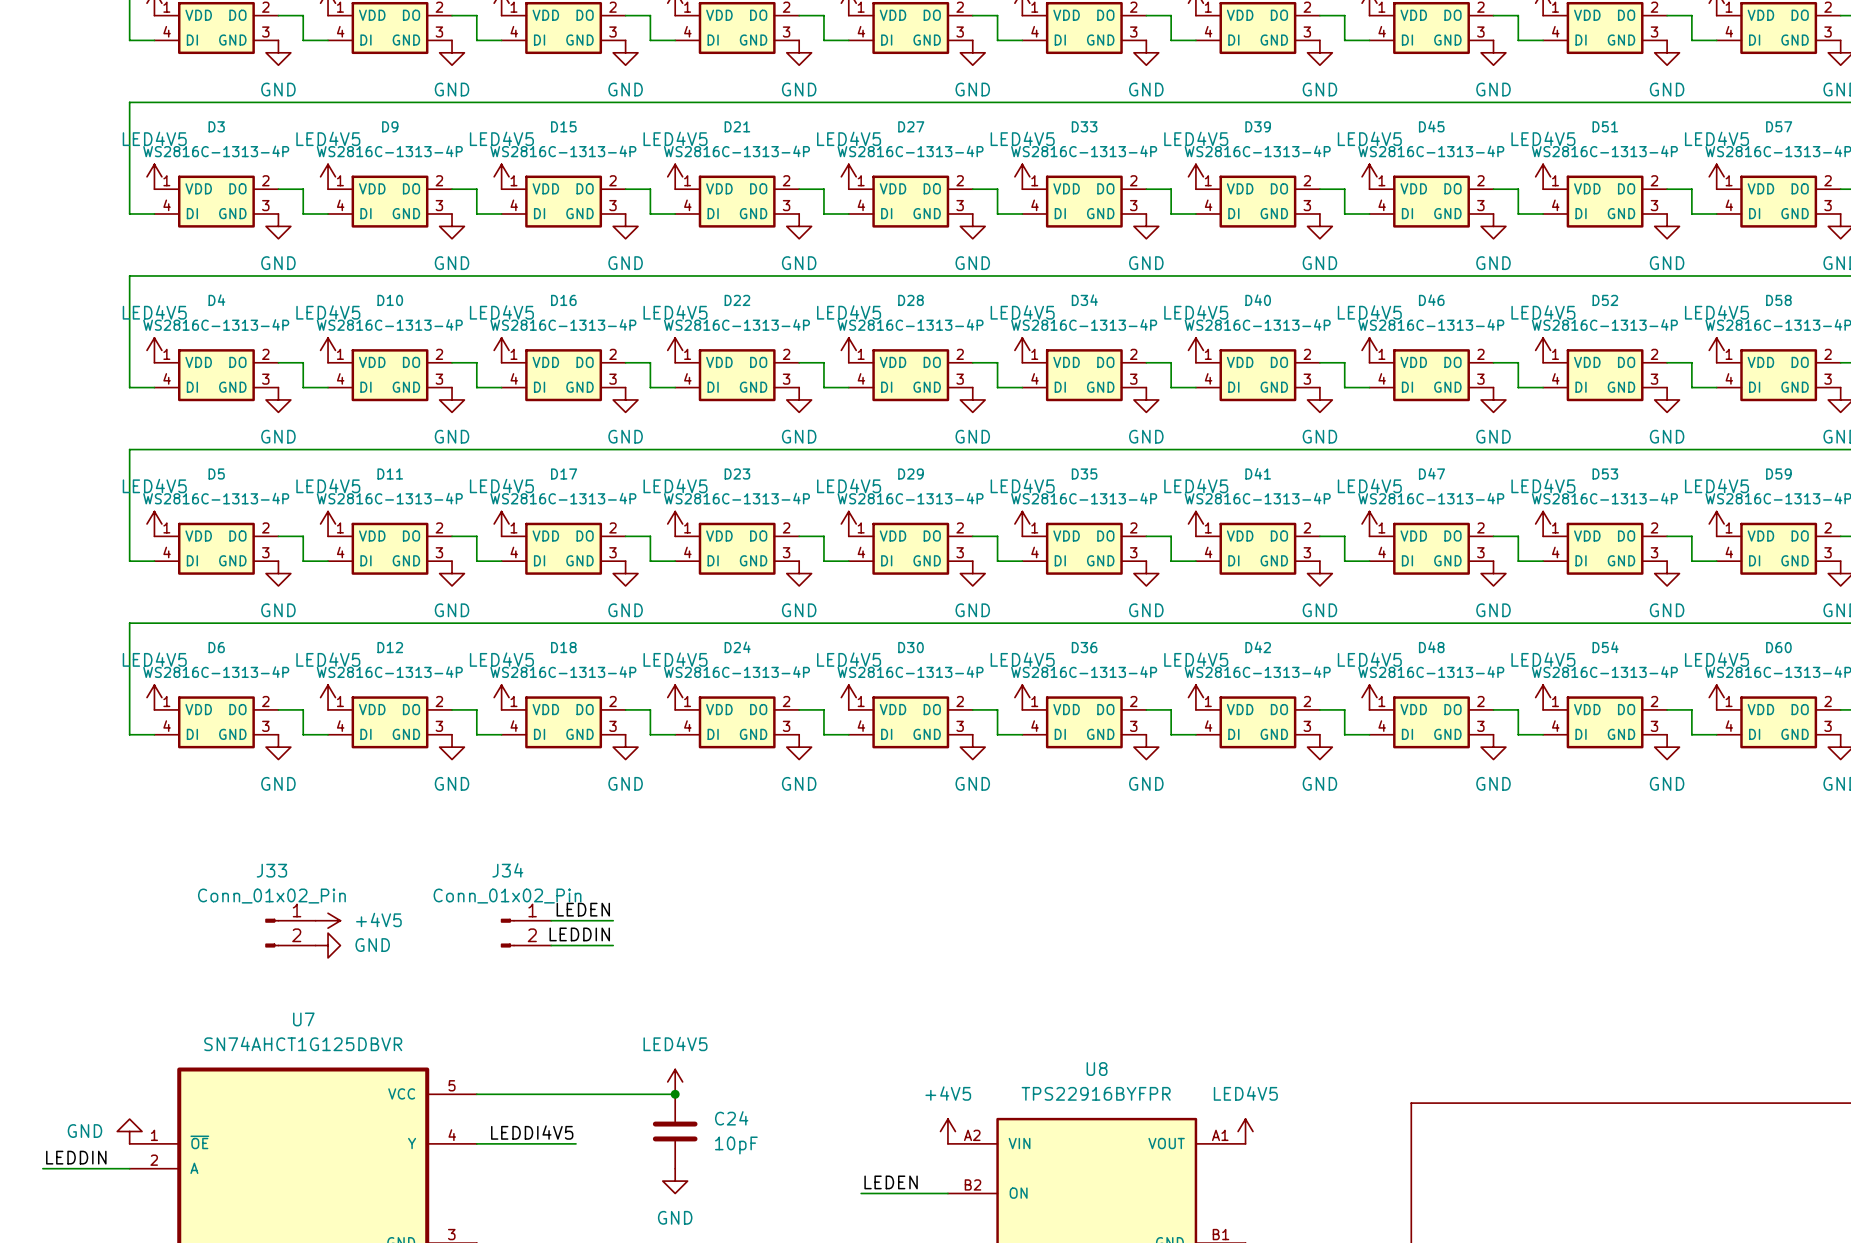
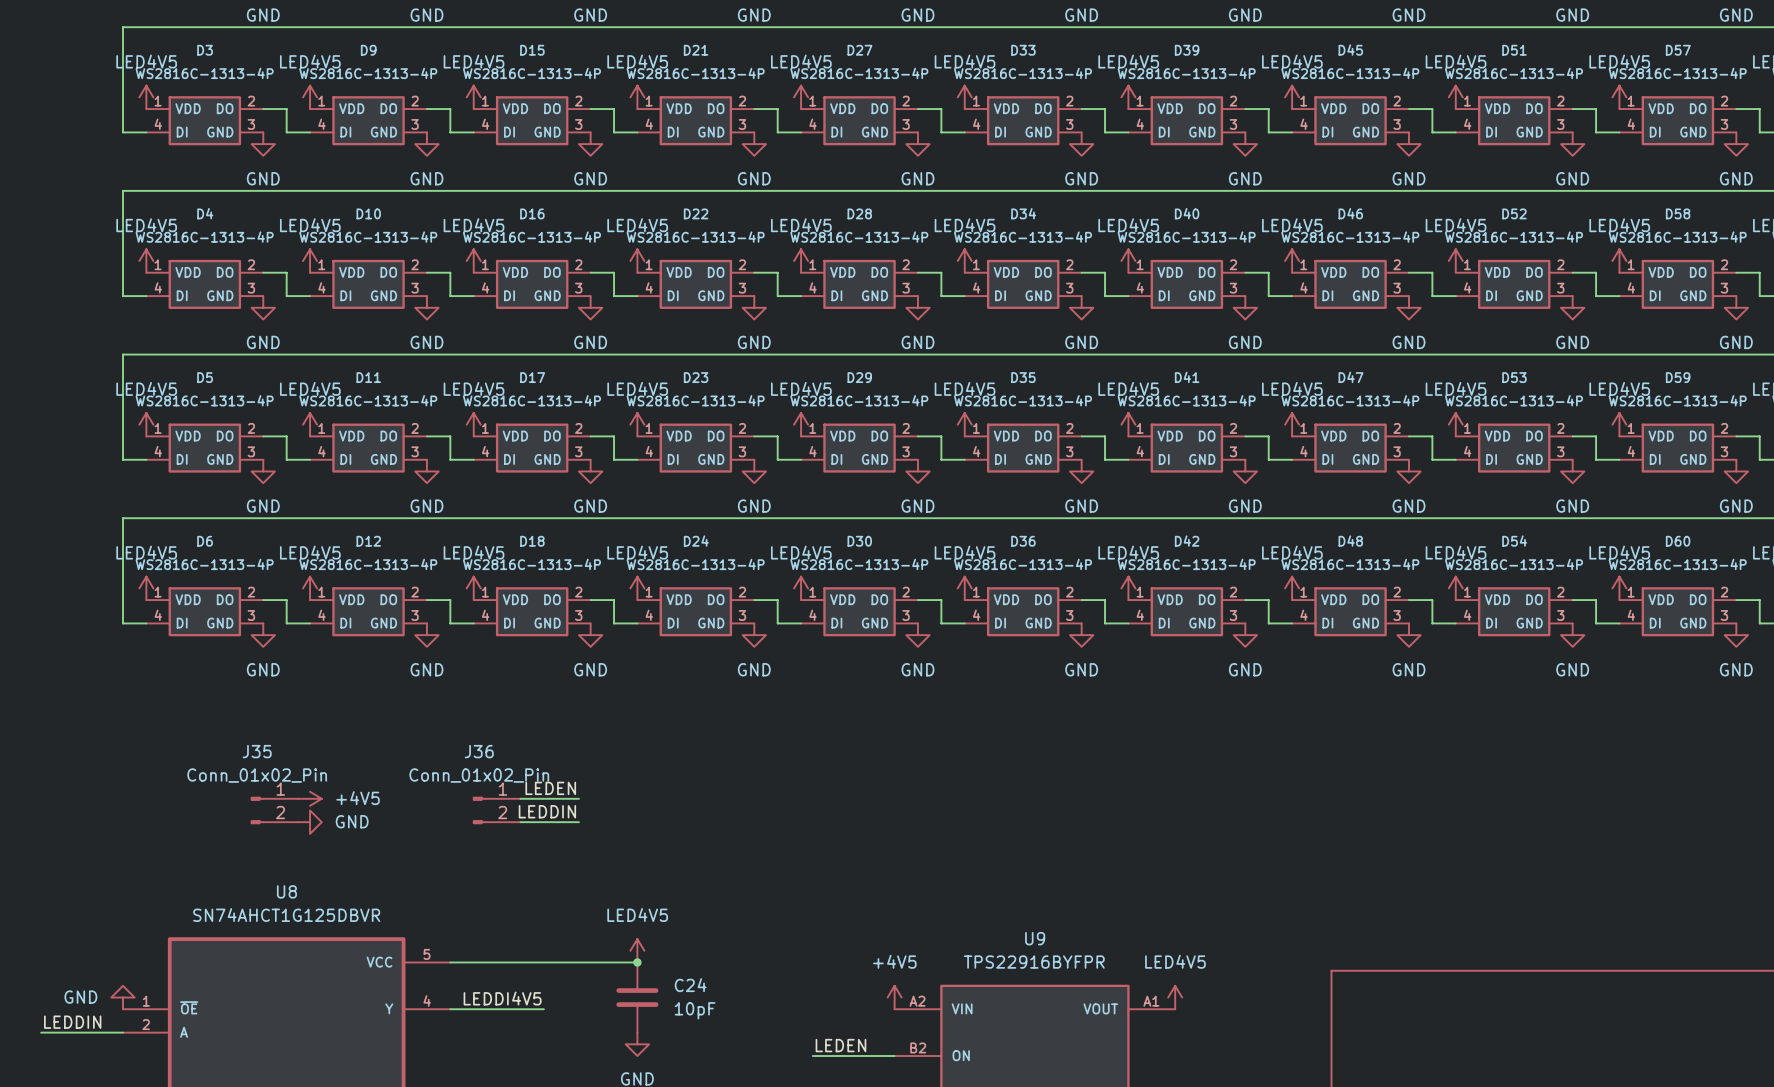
J33 name: J33 (271, 870) -> J35 (257, 751)
J34 name: J34 (507, 870) -> J36 (479, 751)
U7 name: U7 (303, 1019) -> U8 (286, 891)
U8 name: U8 (1097, 1069) -> U9 (1035, 938)

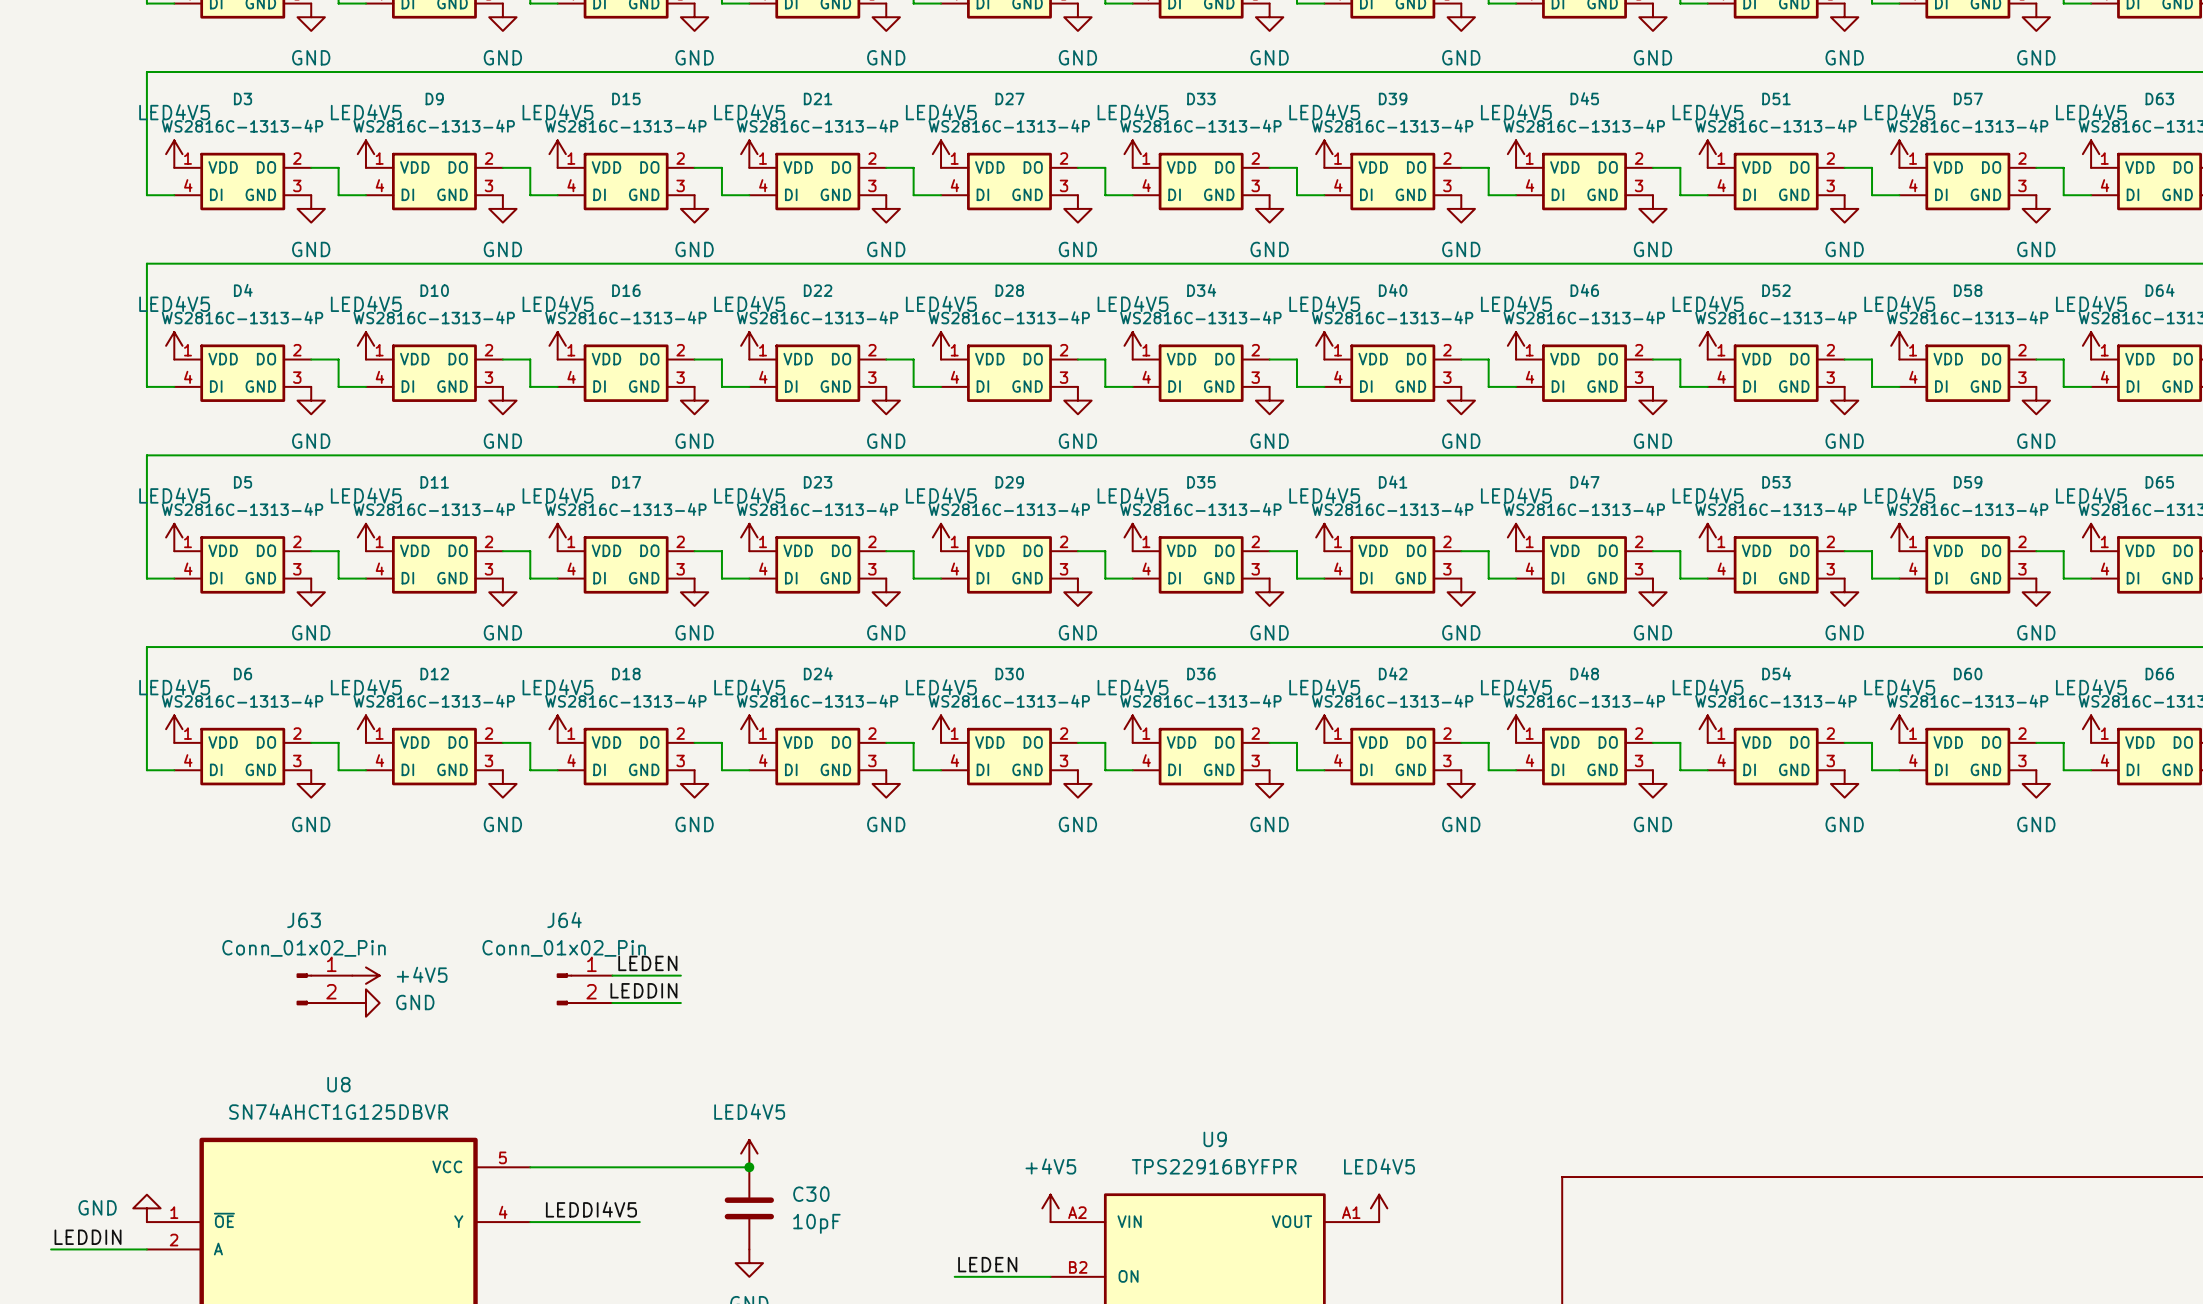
J35 name: J35 (257, 751) -> J63 (304, 920)
J36 name: J36 (479, 751) -> J64 (564, 920)
C24 name: C24 (690, 985) -> C30 (811, 1194)

